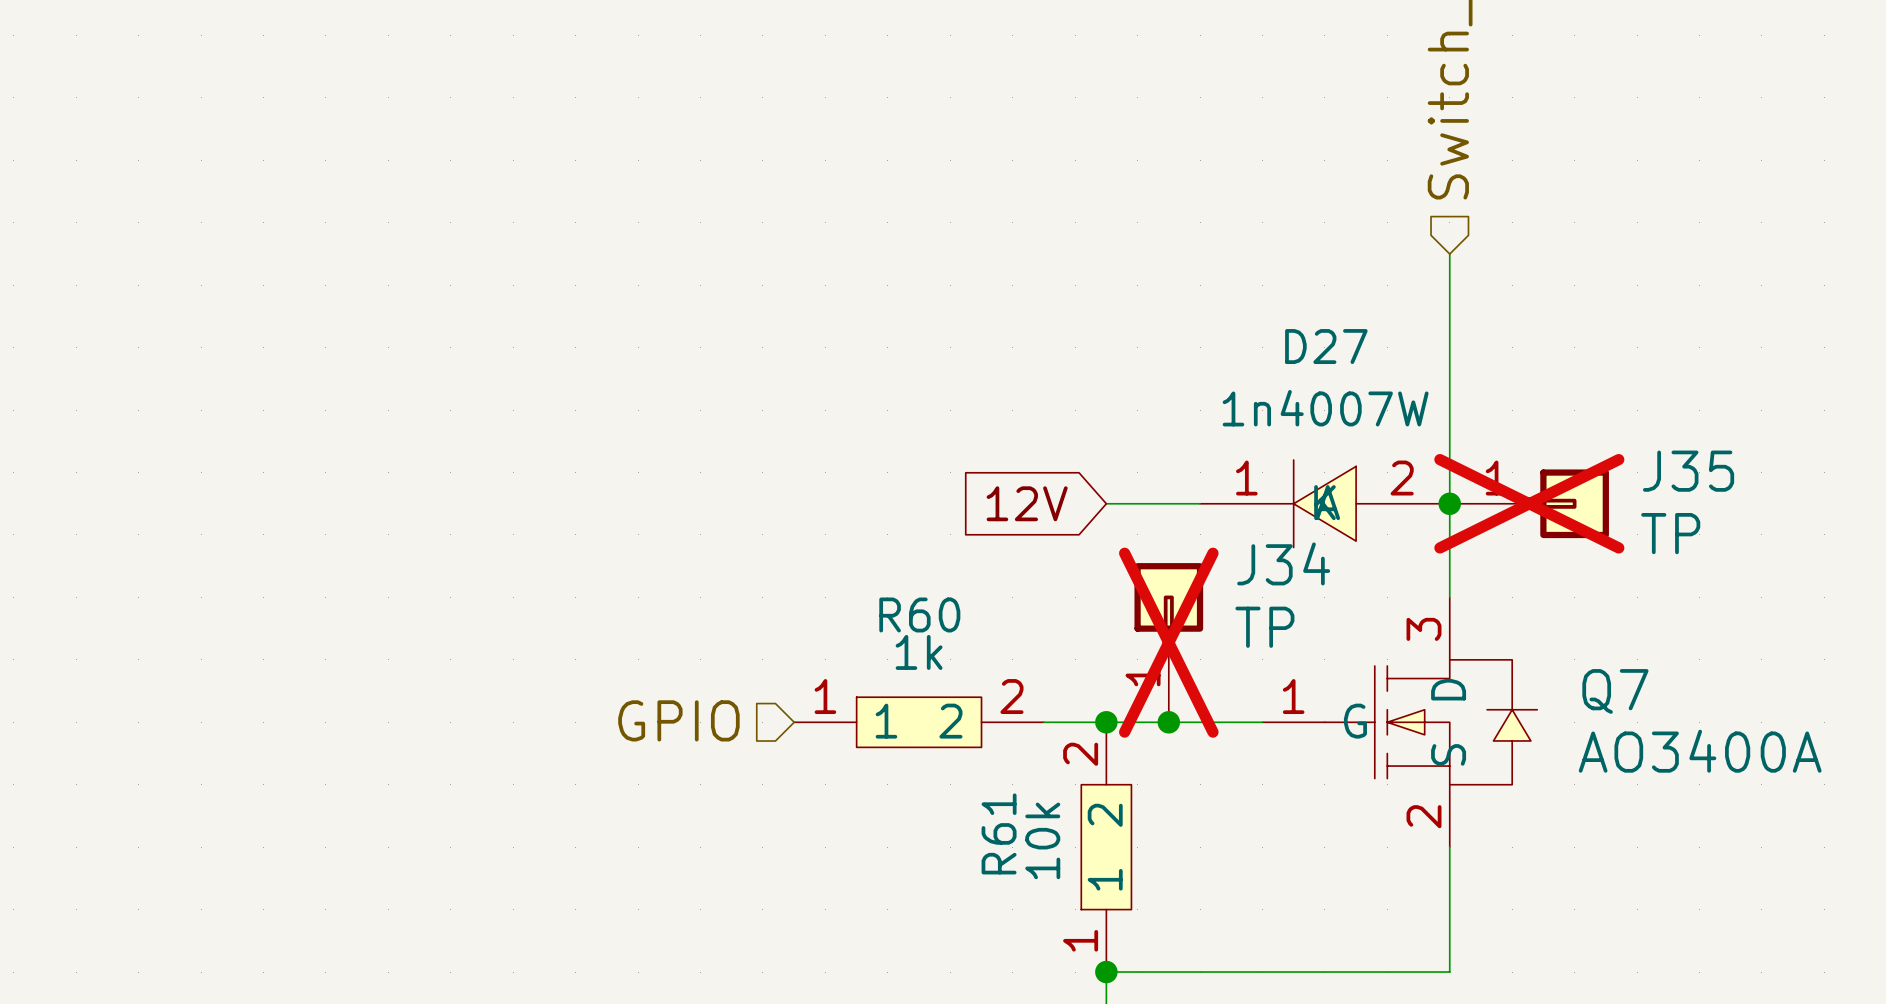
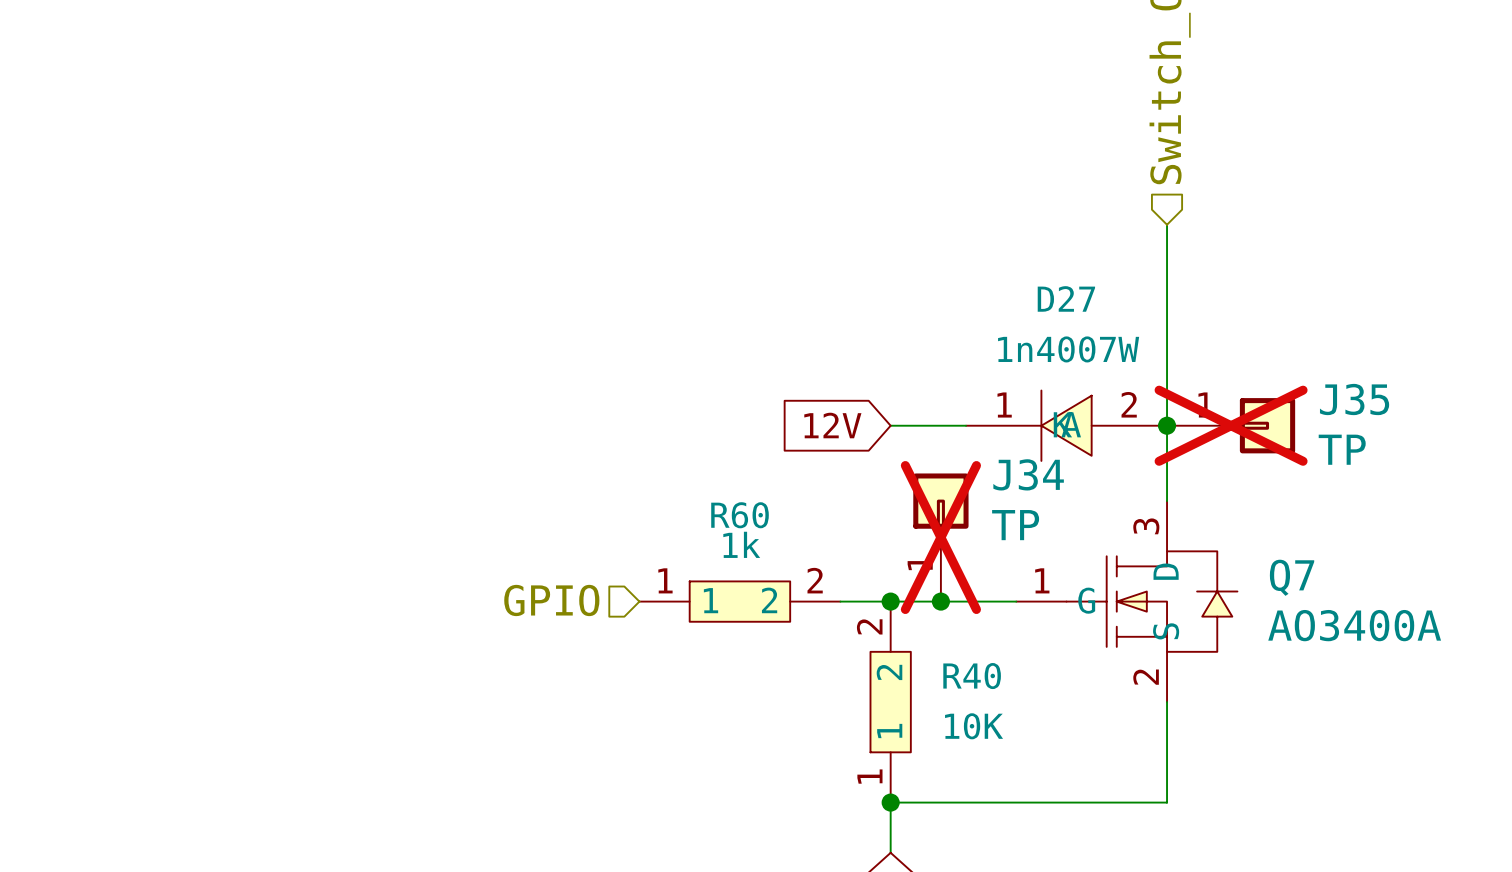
R61 name: R61 (999, 833) -> R40 (972, 676)
R61 value: 10k (1042, 840) -> 10K (974, 726)

